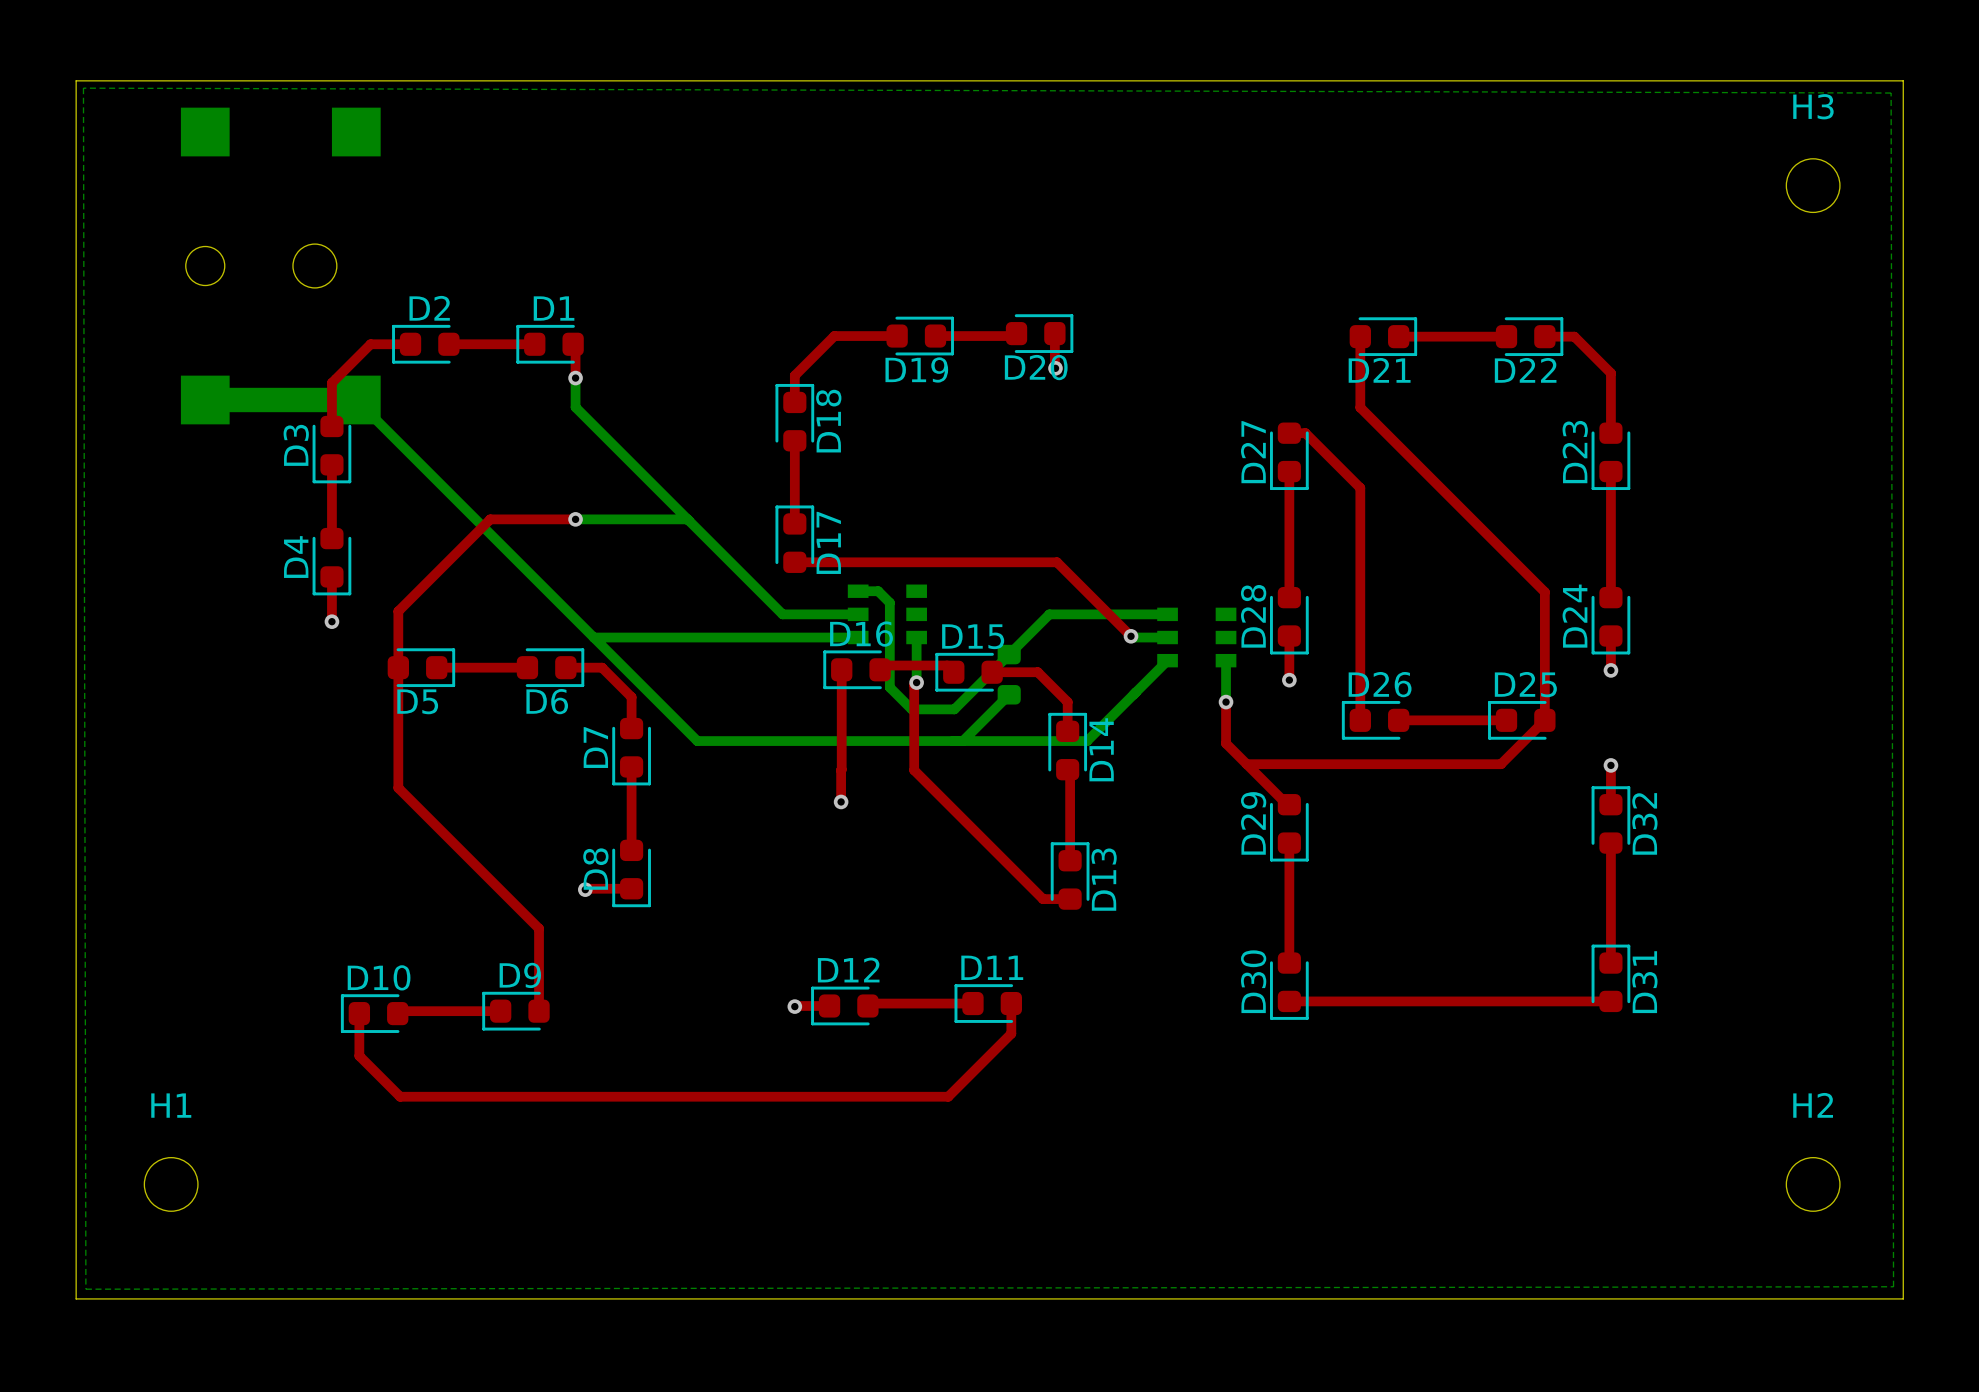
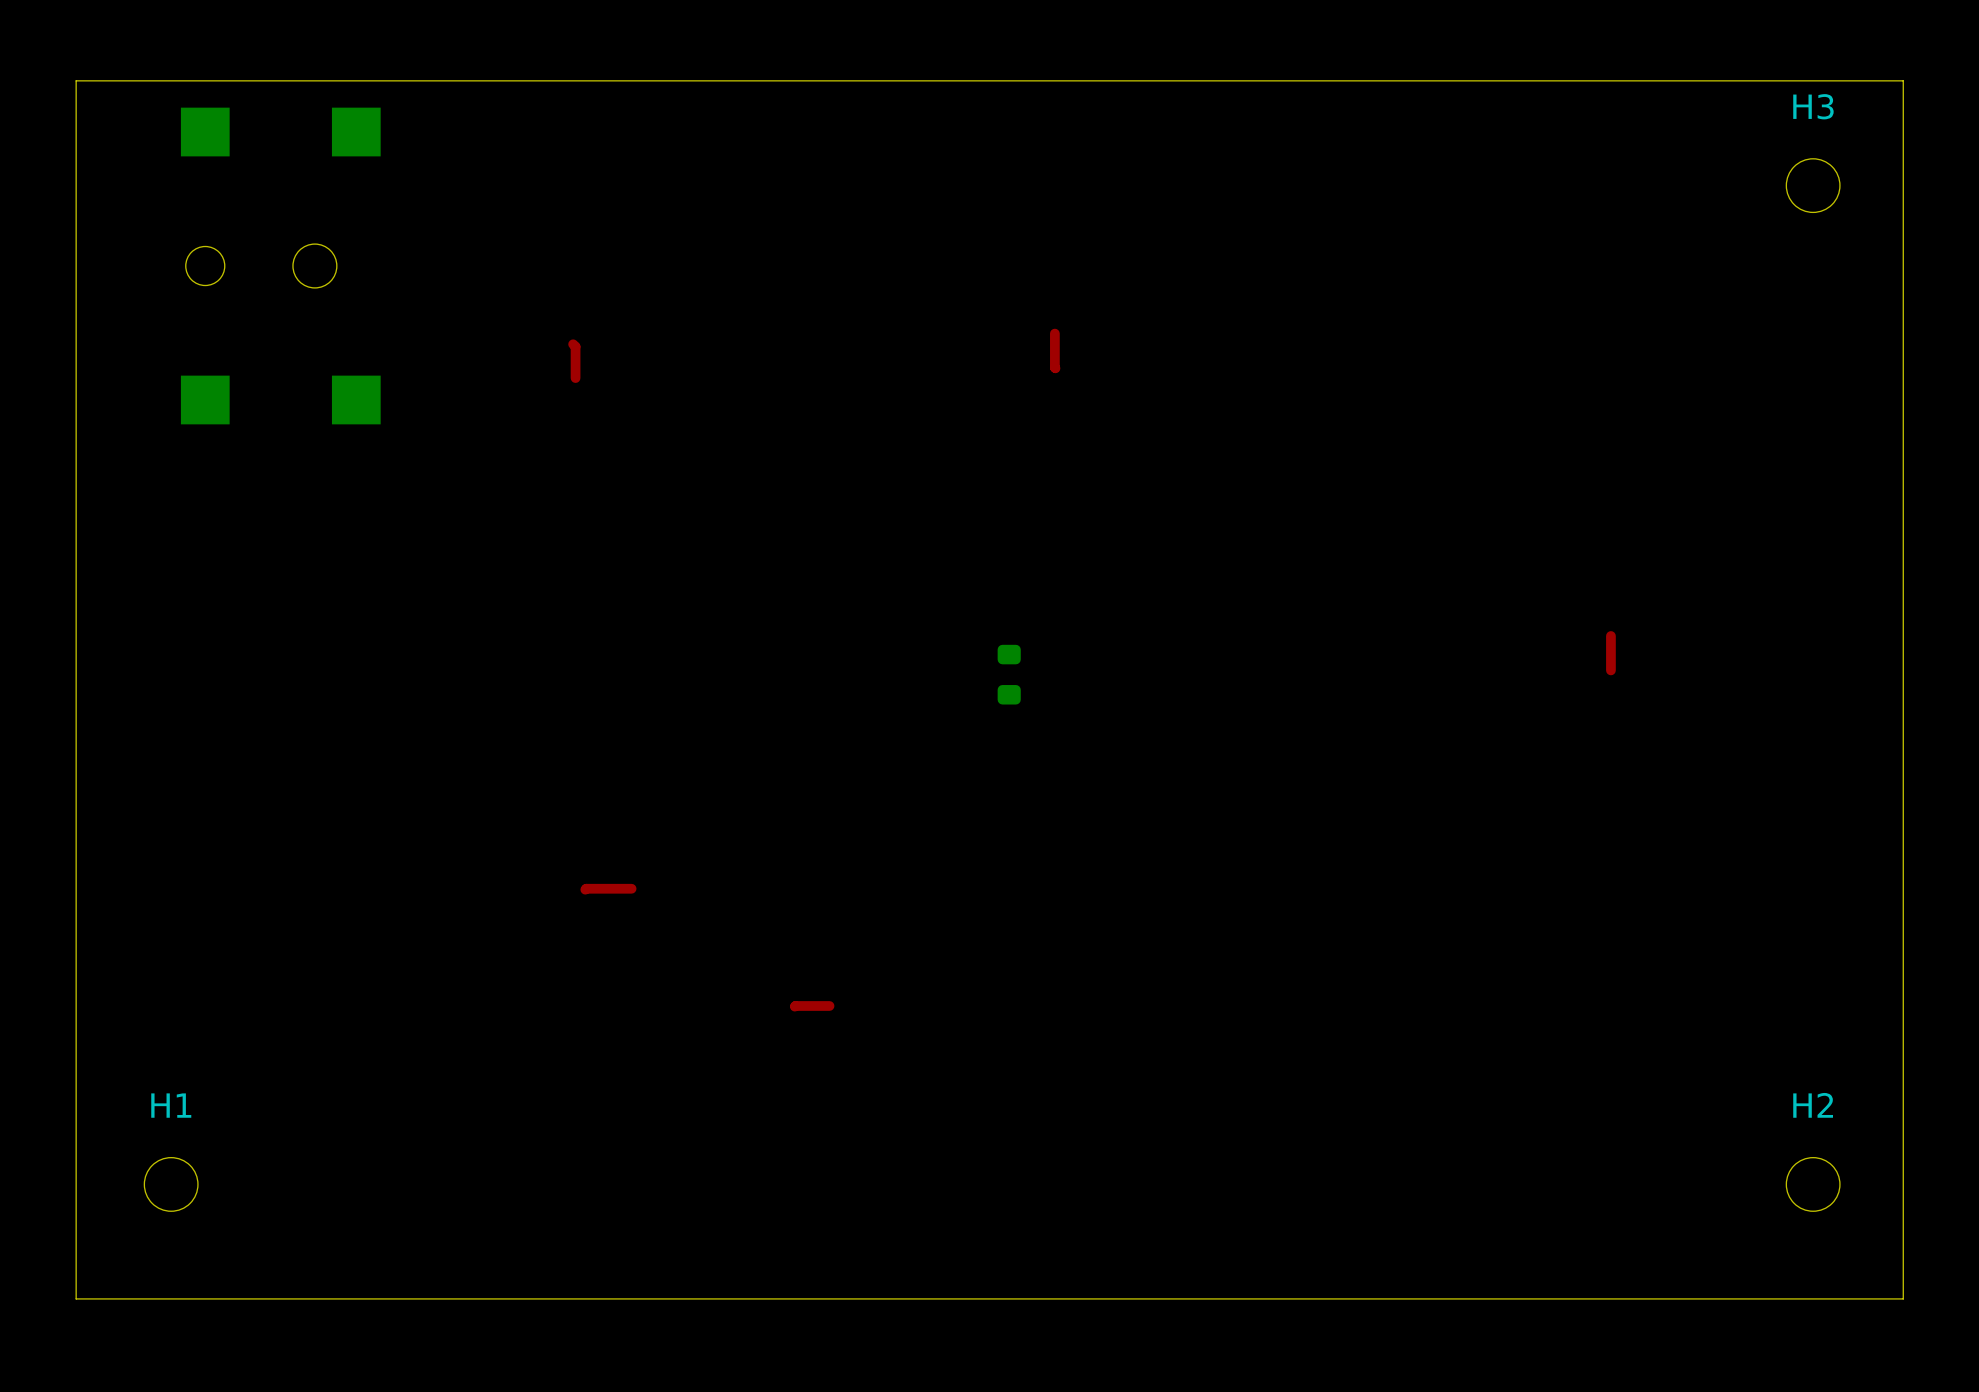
bottom zone outline: (83, 88) (85, 1289) (1893, 1286) (1891, 93) (83, 88) -> none
top track: (1016, 333) (1014, 336) (935, 336) -> none
D20: (1039, 333) -> none
top track: (897, 336) (834, 336) (794, 375) (794, 402) -> none
D19: (920, 336) -> none
top track: (1360, 336) (1360, 407) (1544, 592) (1544, 720) (1501, 764) (1246, 764) -> none
D21: (1383, 336) -> none
top track: (1398, 336) (1506, 336) -> none
D22: (1529, 336) -> none
top track: (1544, 336) (1574, 336) (1610, 373) (1610, 433) -> none
top track: (410, 344) (370, 344) (331, 382) (331, 426) -> none
D2: (425, 344) -> none
top track: (448, 344) (534, 344) -> none
D1: (550, 344) -> none
via: (1055, 368) -> none
bottom track: (575, 378) (575, 407) (782, 614) (858, 614) -> none
via: (575, 378) -> none
bottom track: (205, 399) (356, 399) (697, 741) (1087, 741) (1167, 660) -> none
D18: (794, 417) -> none
top track: (1289, 433) (1305, 433) (1360, 488) (1360, 720) -> none
top track: (794, 440) (794, 523) -> none
D3: (331, 449) -> none
D27: (1289, 456) -> none
D23: (1610, 456) -> none
top track: (331, 464) (331, 538) -> none
top track: (1289, 471) (1289, 597) -> none
top track: (1610, 471) (1610, 597) -> none
top track: (575, 519) (490, 519) (398, 611) (398, 787) (539, 928) (539, 1011) -> none
bottom track: (575, 519) (687, 519) -> none
via: (575, 519) -> none
D17: (794, 539) -> none
D4: (331, 561) -> none
top track: (794, 562) (1057, 562) (1131, 636) -> none
top track: (331, 576) (331, 621) -> none
bottom track: (858, 591) (878, 591) (889, 602) (889, 687) (911, 709) (954, 709) (1049, 614) (1167, 614) -> none
part: (887, 614) -> none
D28: (1289, 620) -> none
D24: (1610, 620) -> none
via: (331, 621) -> none
top track: (1289, 635) (1289, 680) -> none
bottom track: (1131, 636) (1167, 637) -> none
via: (1131, 636) -> none
bottom track: (593, 637) (858, 637) -> none
bottom track: (916, 637) (916, 682) -> none
part: (1196, 637) -> none
bottom track: (1226, 660) (1226, 702) -> none
D5: (421, 667) -> none
top track: (436, 667) (527, 667) -> none
D6: (550, 667) -> none
top track: (565, 667) (602, 667) (631, 697) (631, 728) -> none
top track: (841, 669) (841, 801) -> none
D16: (857, 669) -> none
top track: (880, 669) (884, 665) (947, 665) (953, 672) -> none
via: (1610, 670) -> none
D15: (969, 672) -> none
top track: (992, 672) (1037, 672) (1067, 702) (1067, 731) -> none
via: (1289, 680) -> none
top track: (916, 682) (914, 685) (914, 770) (1043, 899) (1070, 899) -> none
via: (916, 682) -> none
bottom track: (1009, 694) (962, 741) -> none
top track: (1226, 702) (1226, 743) (1289, 804) -> none
via: (1226, 702) -> none
D26: (1375, 720) -> none
top track: (1398, 720) (1506, 720) -> none
D25: (1521, 720) -> none
D14: (1067, 746) -> none
D7: (631, 751) -> none
top track: (1610, 765) (1610, 804) -> none
via: (1610, 765) -> none
top track: (631, 766) (631, 850) -> none
top track: (1067, 769) (1070, 772) (1070, 860) -> none
via: (841, 801) -> none
D32: (1610, 819) -> none
D29: (1289, 827) -> none
top track: (1289, 843) (1289, 963) -> none
top track: (1610, 843) (1610, 963) -> none
D8: (631, 873) -> none
D13: (1070, 876) -> none
via: (585, 889) -> none
D31: (1610, 978) -> none
D30: (1289, 986) -> none
top track: (1289, 1001) (1610, 1001) -> none
top track: (972, 1003) (870, 1003) (867, 1005) -> none
D11: (988, 1003) -> none
top track: (1011, 1003) (1011, 1033) (948, 1096) (400, 1096) (359, 1055) (359, 1013) -> none
D12: (844, 1005) -> none
via: (794, 1006) -> none
top track: (500, 1011) (400, 1011) (397, 1013) -> none
D9: (515, 1011) -> none
D10: (374, 1013) -> none

